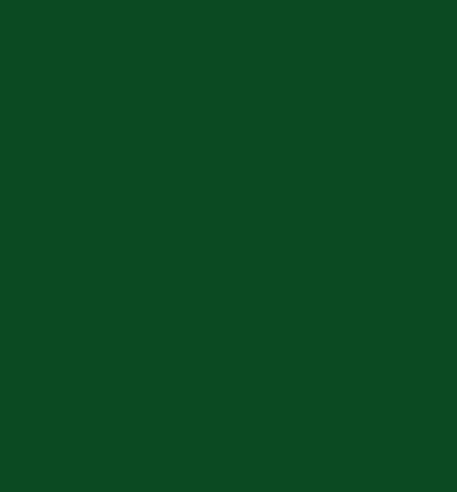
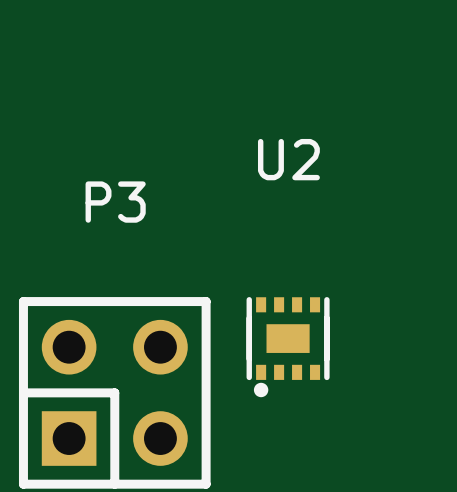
U2: none -> (288, 347)
P3: none -> (114, 392)

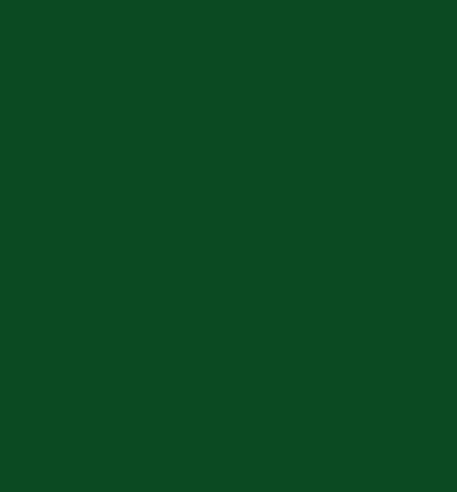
U2: (288, 347) -> none
P3: (114, 392) -> none

